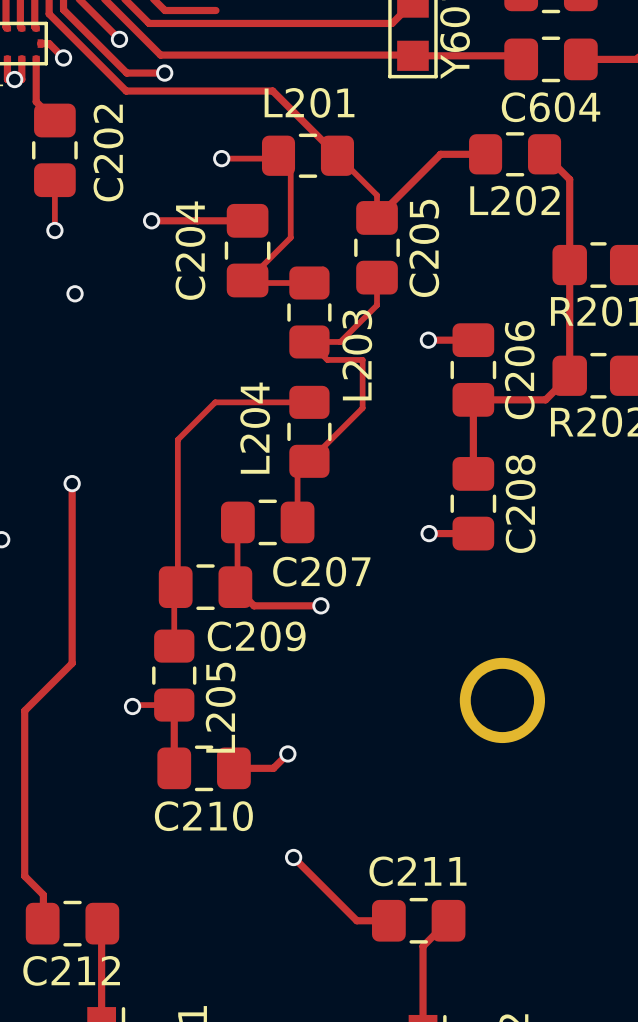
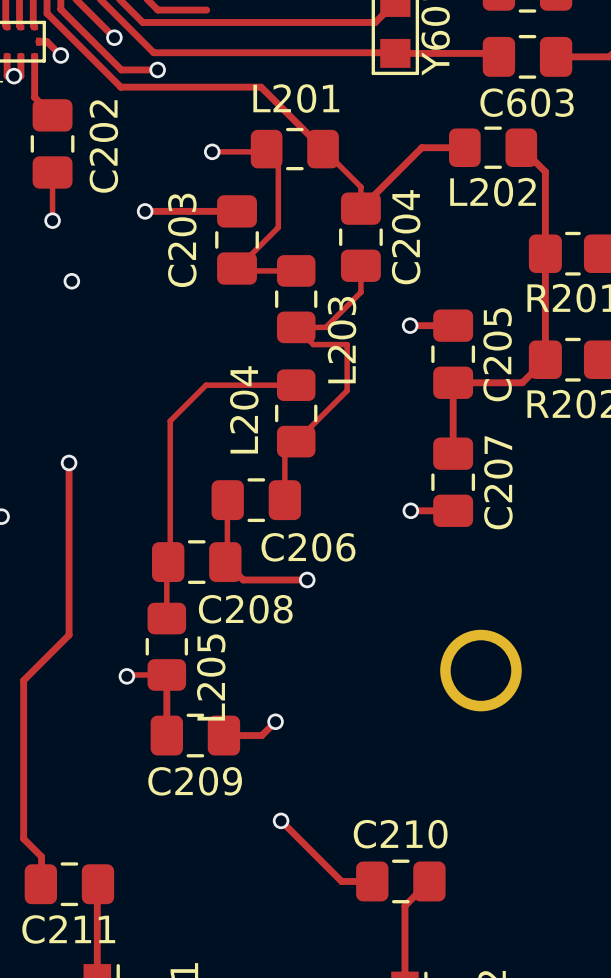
C604 name: C604 (551, 107) -> C603 (527, 102)
C205 name: C205 (424, 248) -> C204 (406, 237)
C204 name: C204 (190, 250) -> C203 (182, 240)
C206 name: C206 (519, 370) -> C205 (497, 354)
C208 name: C208 (520, 503) -> C207 (498, 482)
C207 name: C207 (321, 571) -> C206 (308, 547)
C209 name: C209 (256, 636) -> C208 (245, 609)
C210 name: C210 (203, 816) -> C209 (195, 781)
C211 name: C211 (418, 871) -> C210 (400, 834)
C212 name: C212 (71, 970) -> C211 (68, 929)

